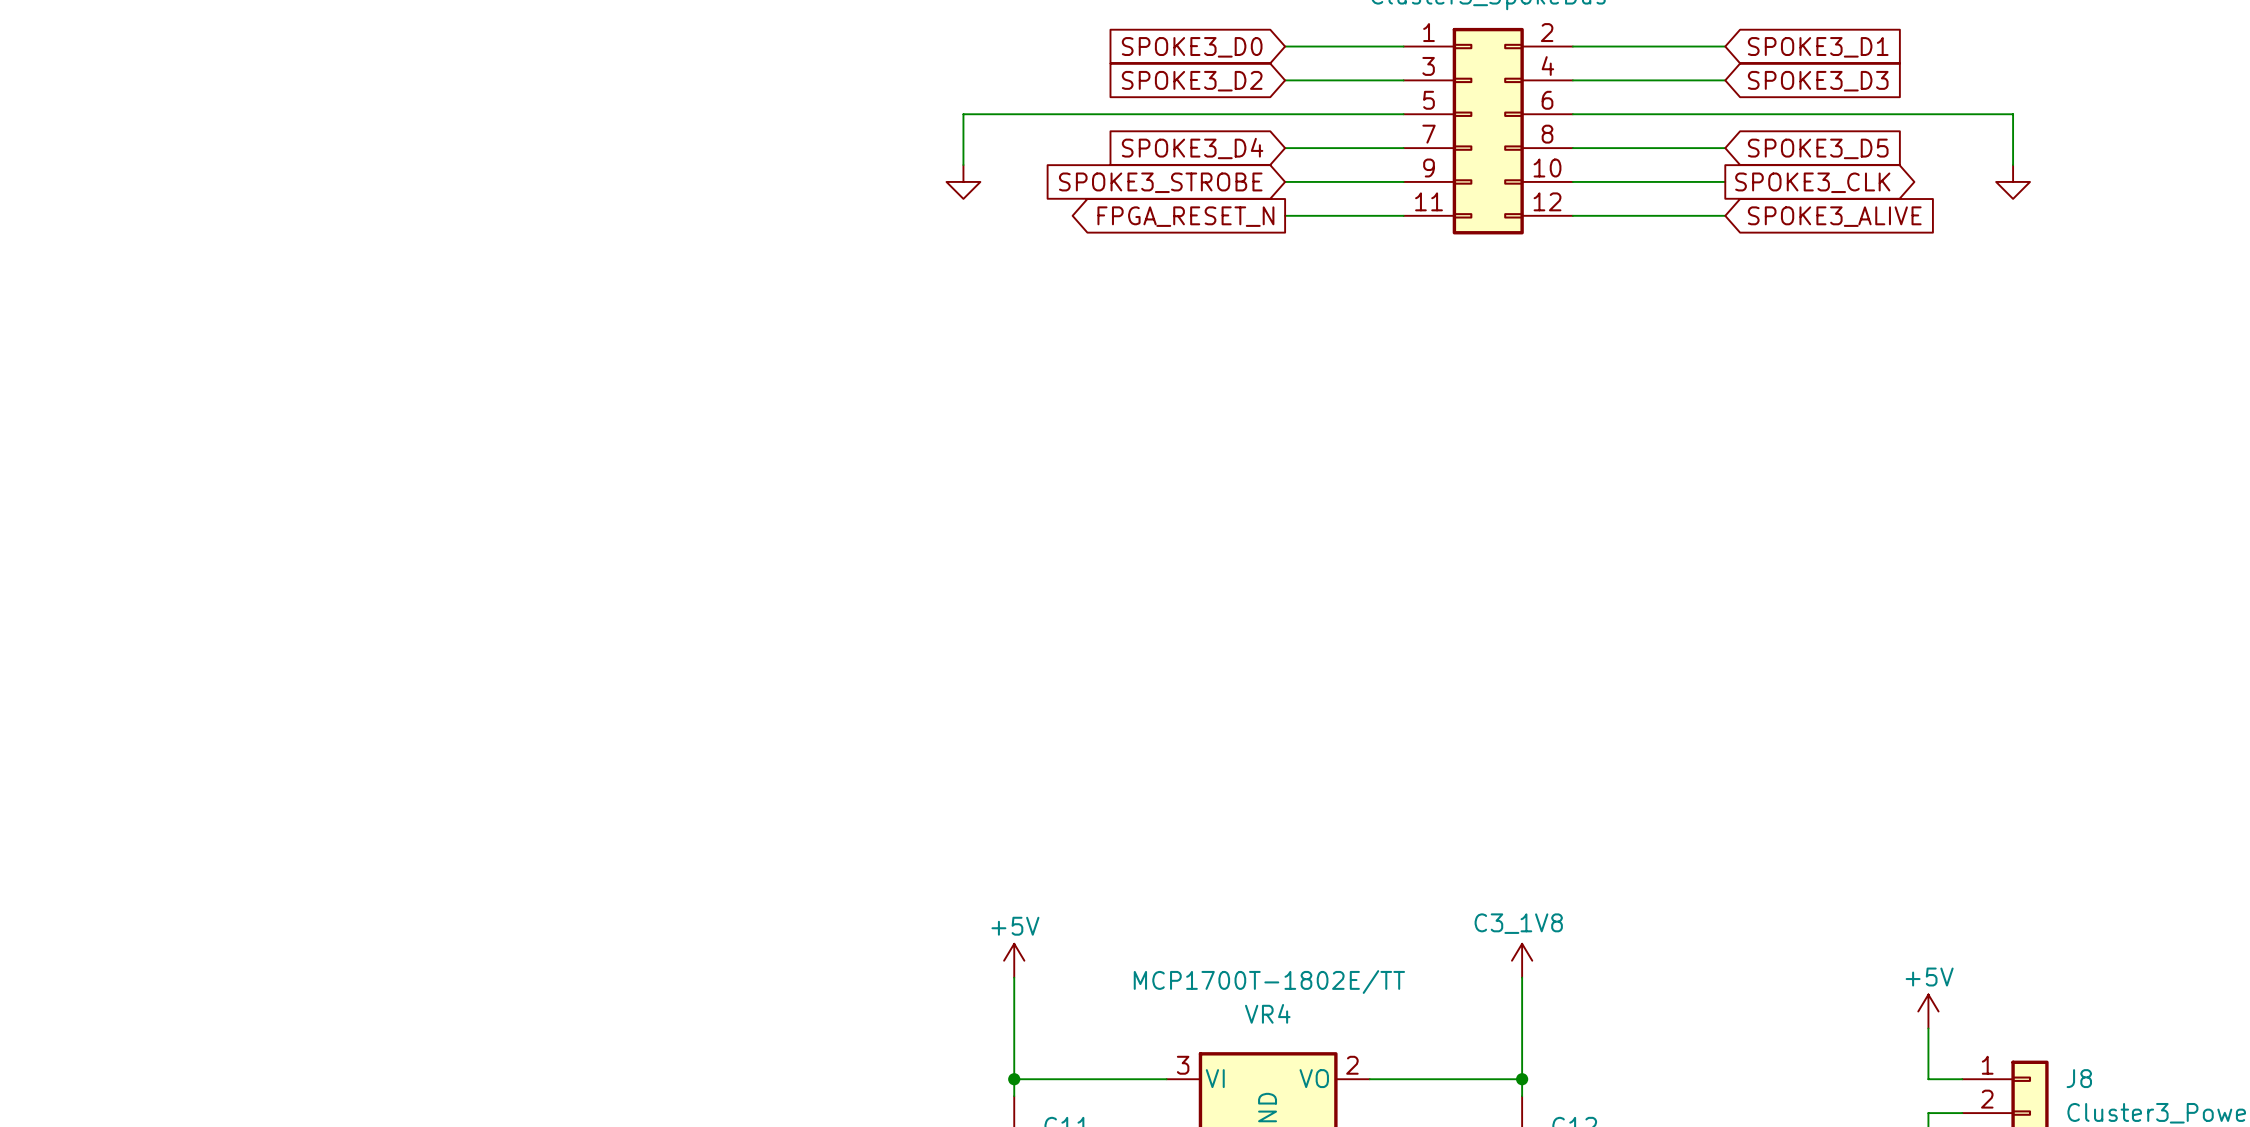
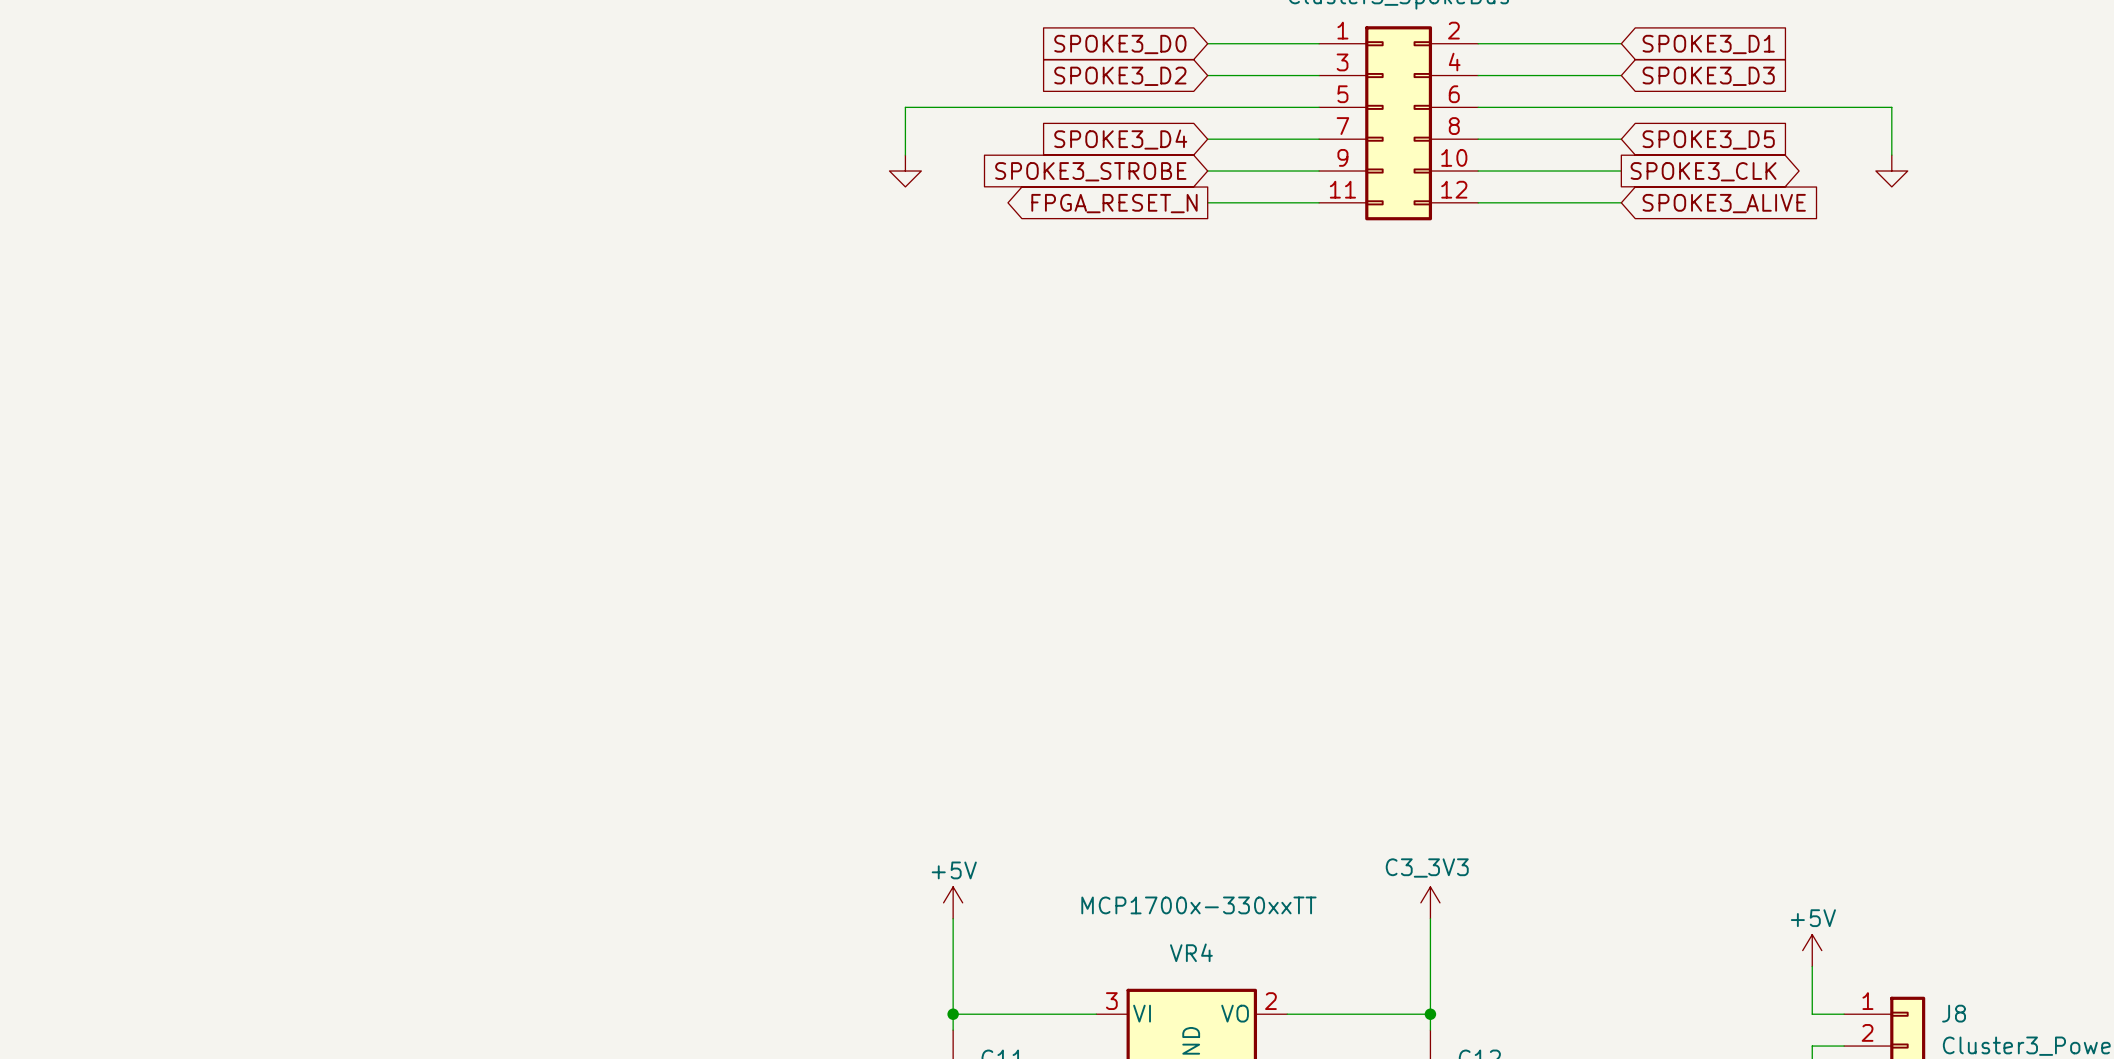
power symbol: C3_1V8 (1522, 960) -> C3_3V3 (1430, 902)
VR4 value: MCP1700T-1802E/TT (1269, 982) -> MCP1700x-330xxTT (1198, 905)

